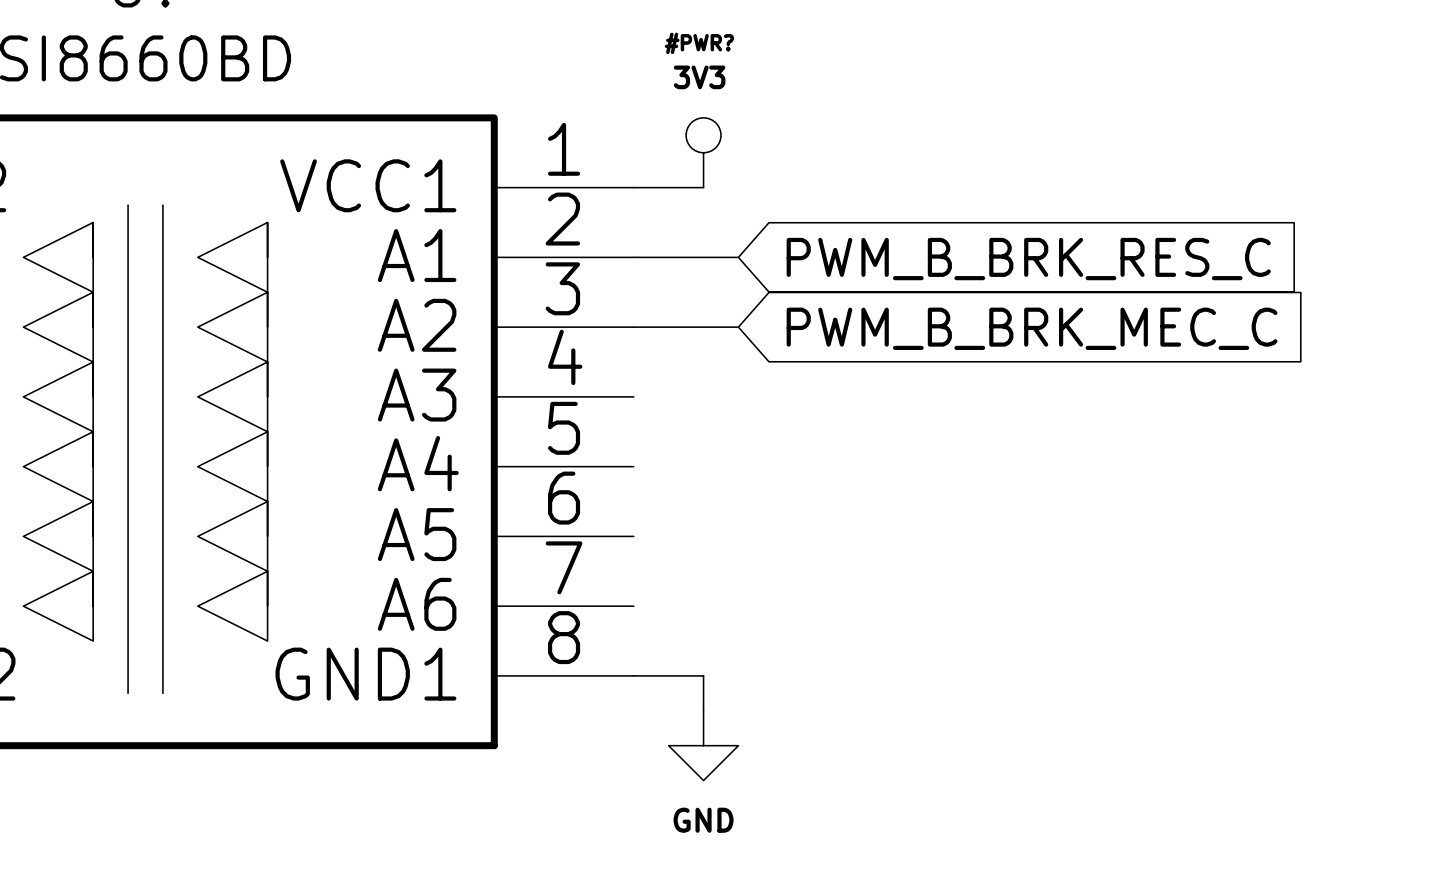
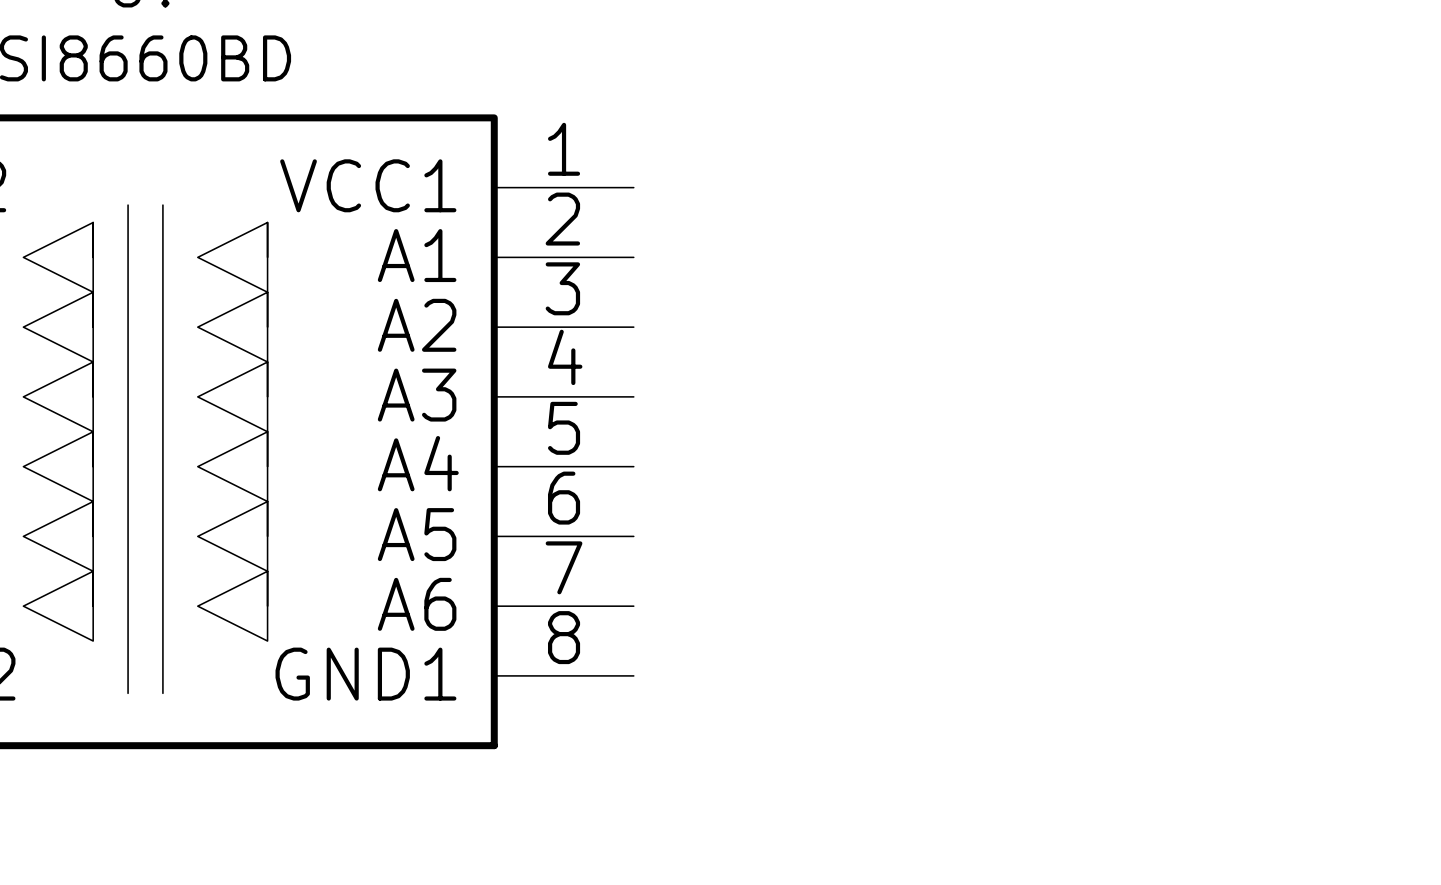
#PWR?: 3V3 (703, 152) -> none
wire: (633, 187) (703, 187) -> none
wire: (633, 257) (738, 257) -> none
global label: PWM_B_BRK_RES_C (1028, 259) -> none
wire: (633, 327) (738, 327) -> none
global label: PWM_B_BRK_MEC_C (1032, 328) -> none
wire: (633, 675) (703, 675) (703, 710) -> none
power symbol: GND (703, 745) -> none

